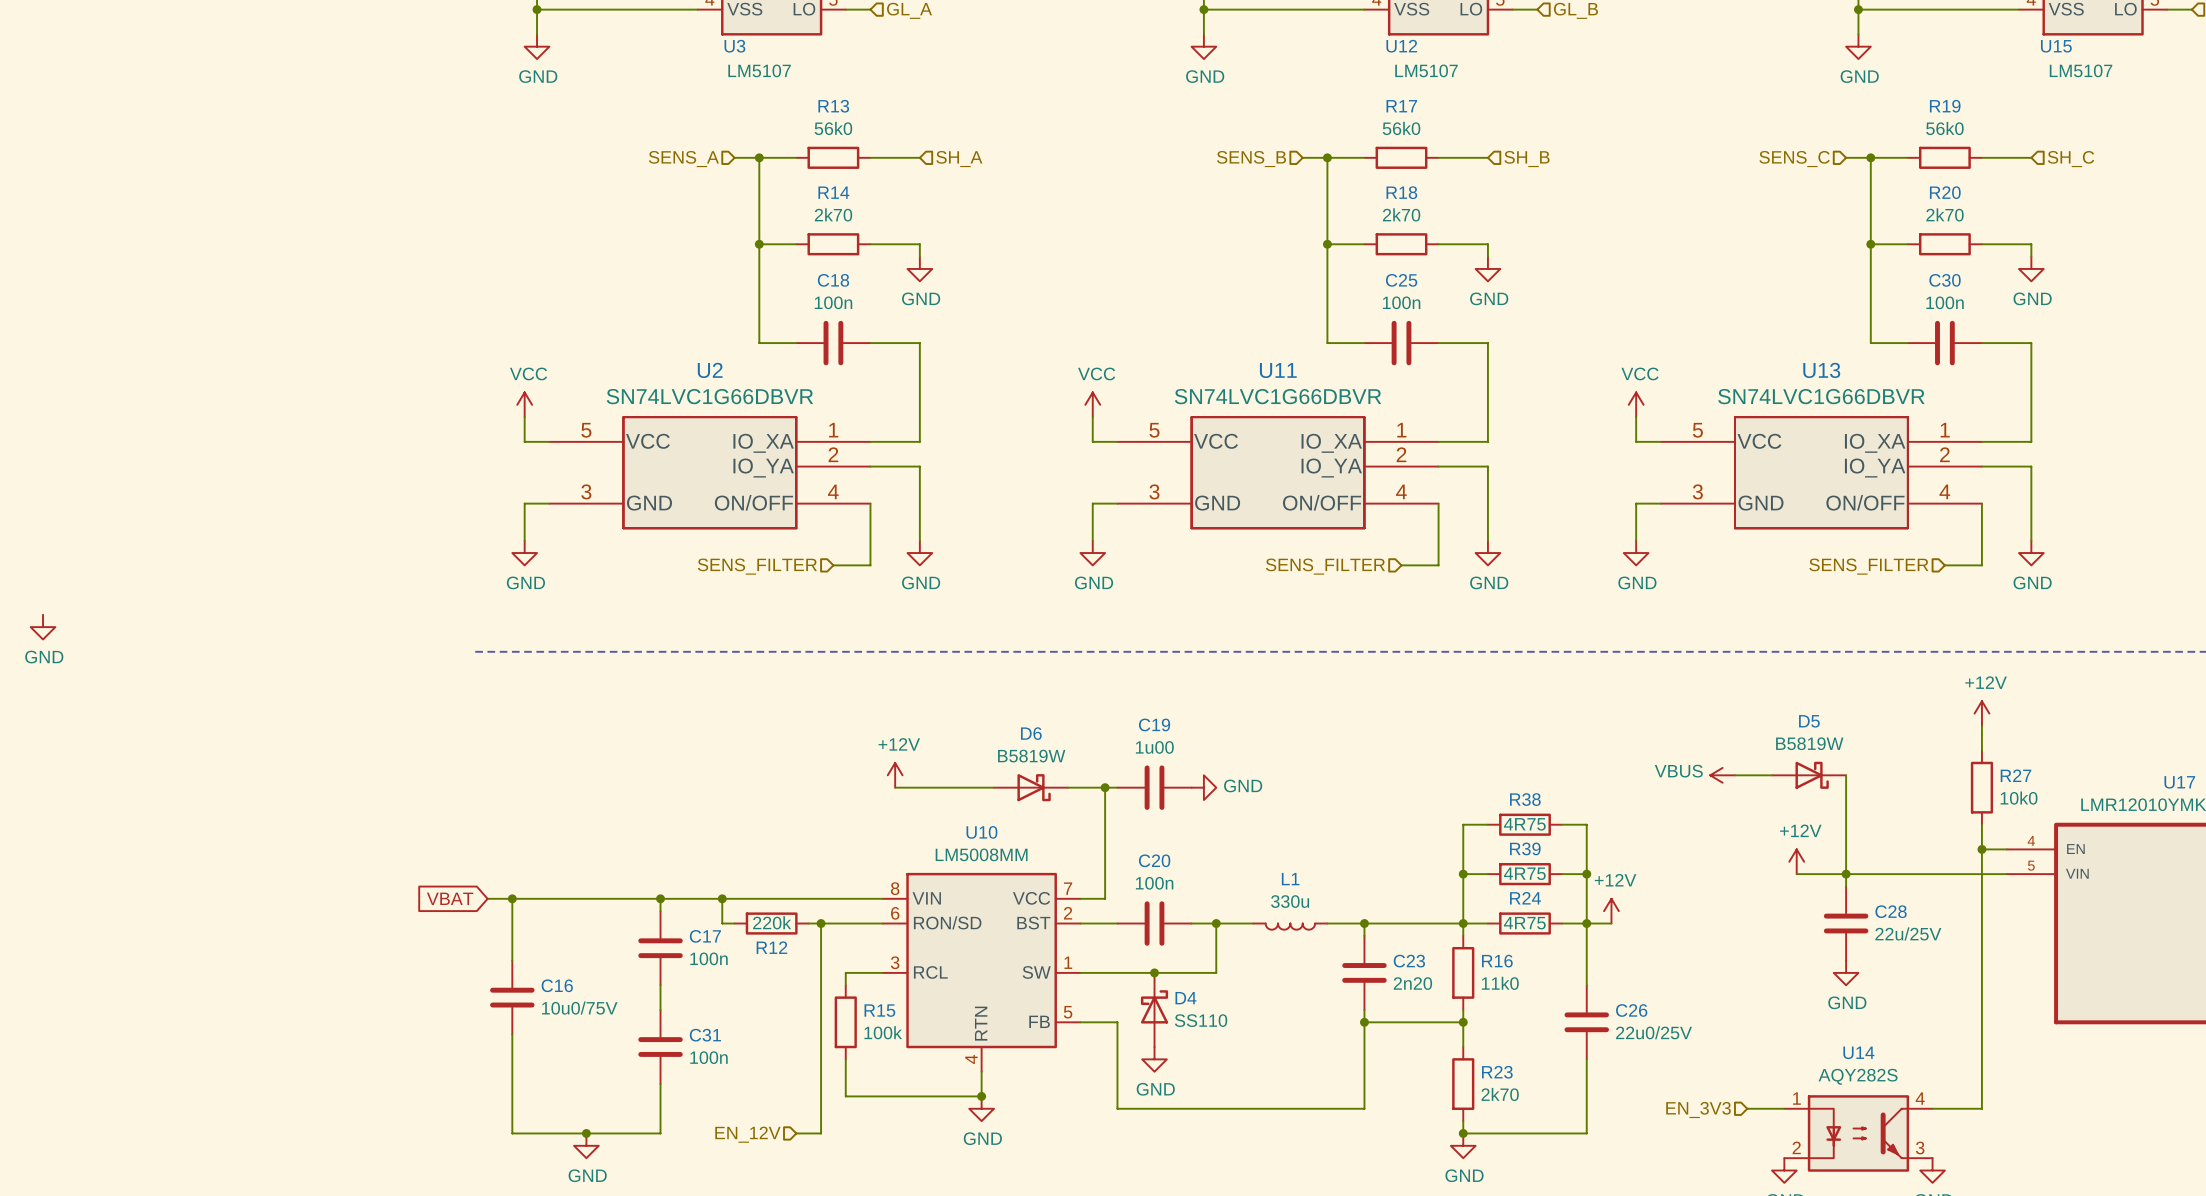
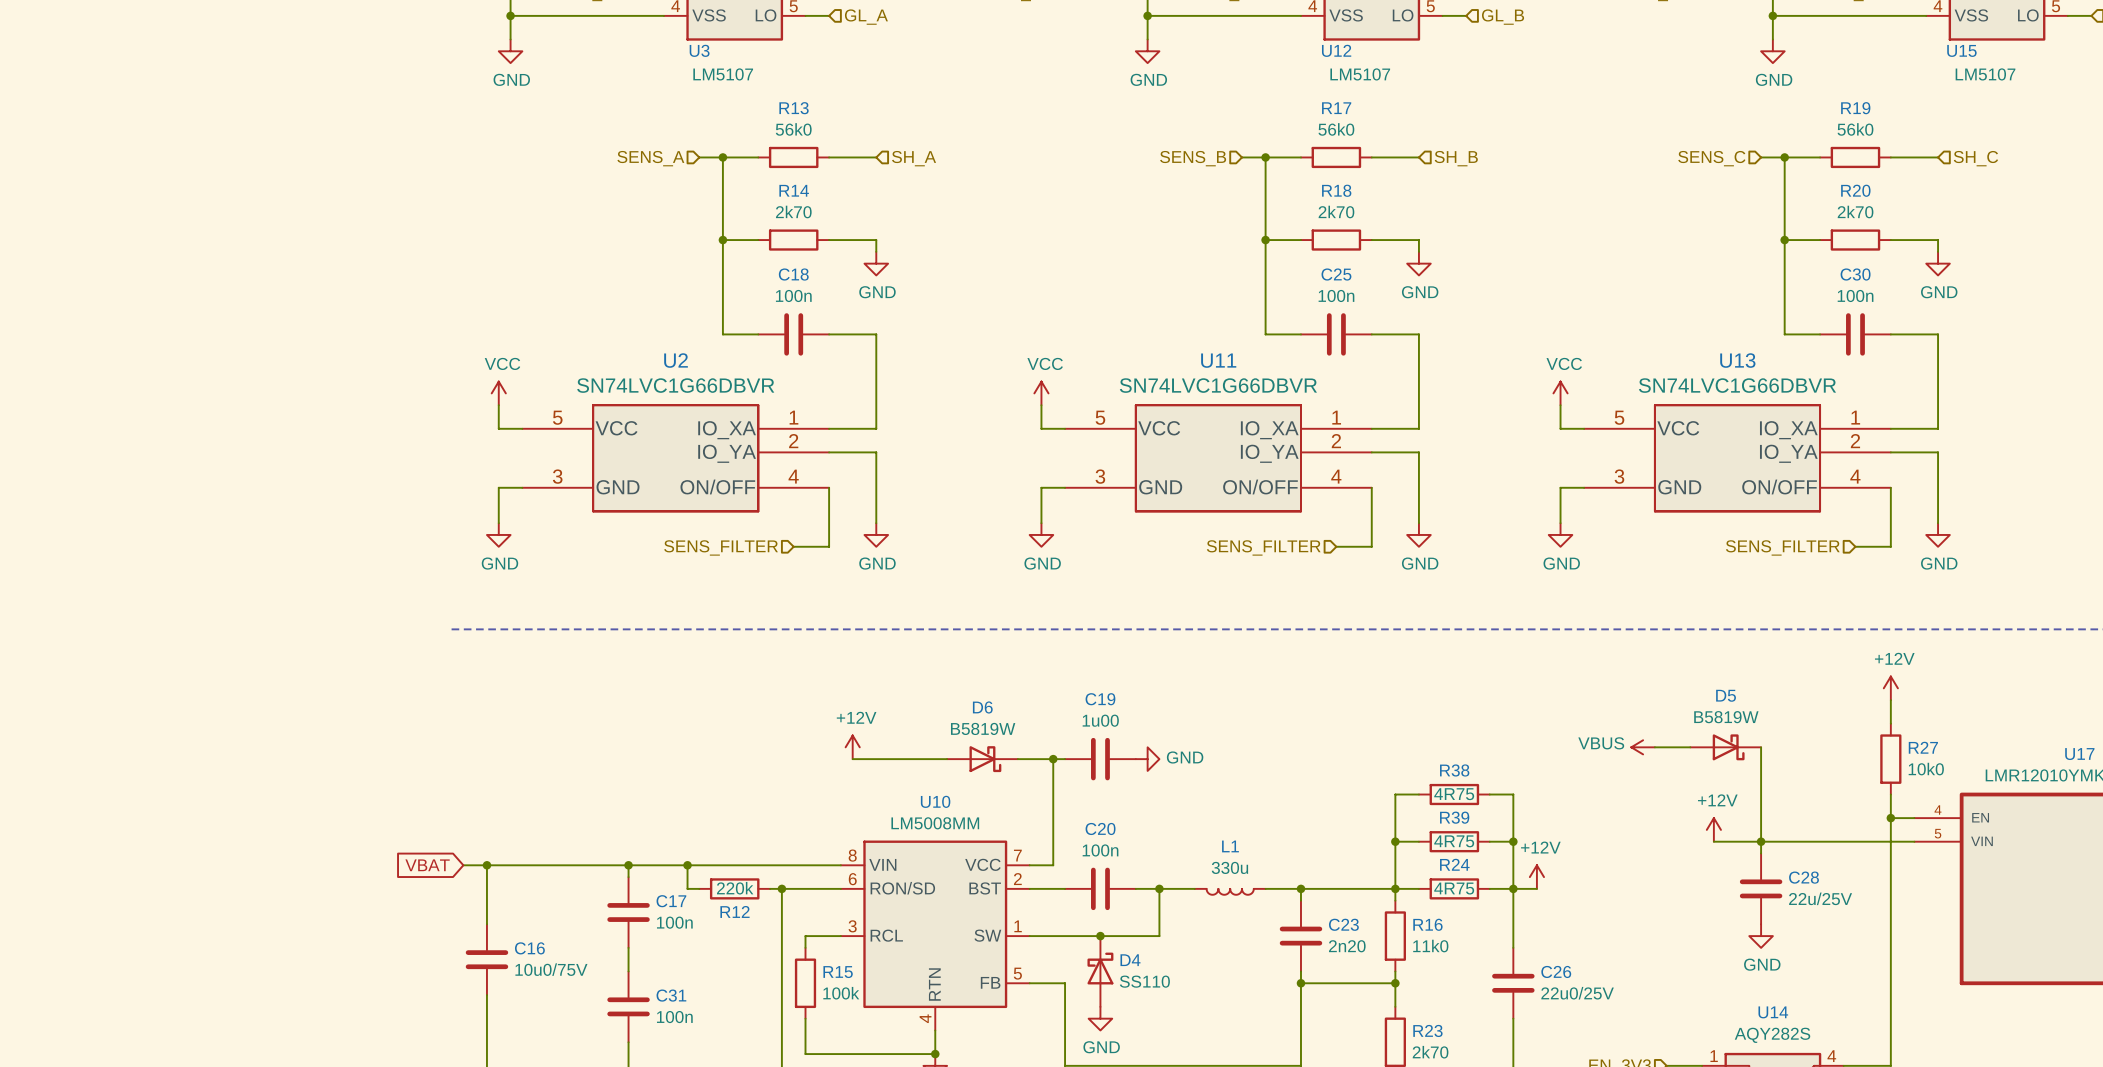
power symbol: GND (43, 627) -> none

